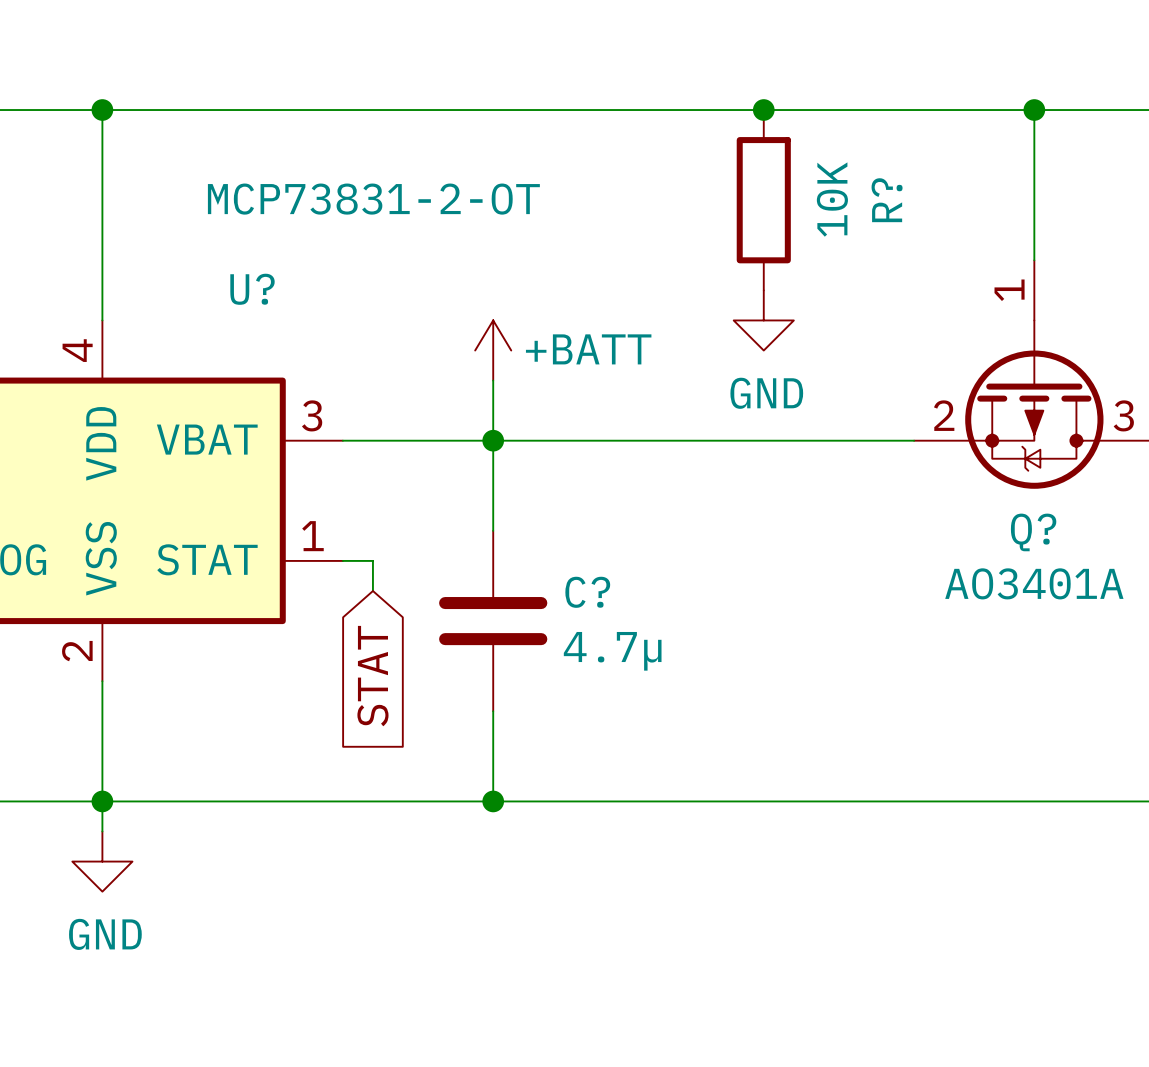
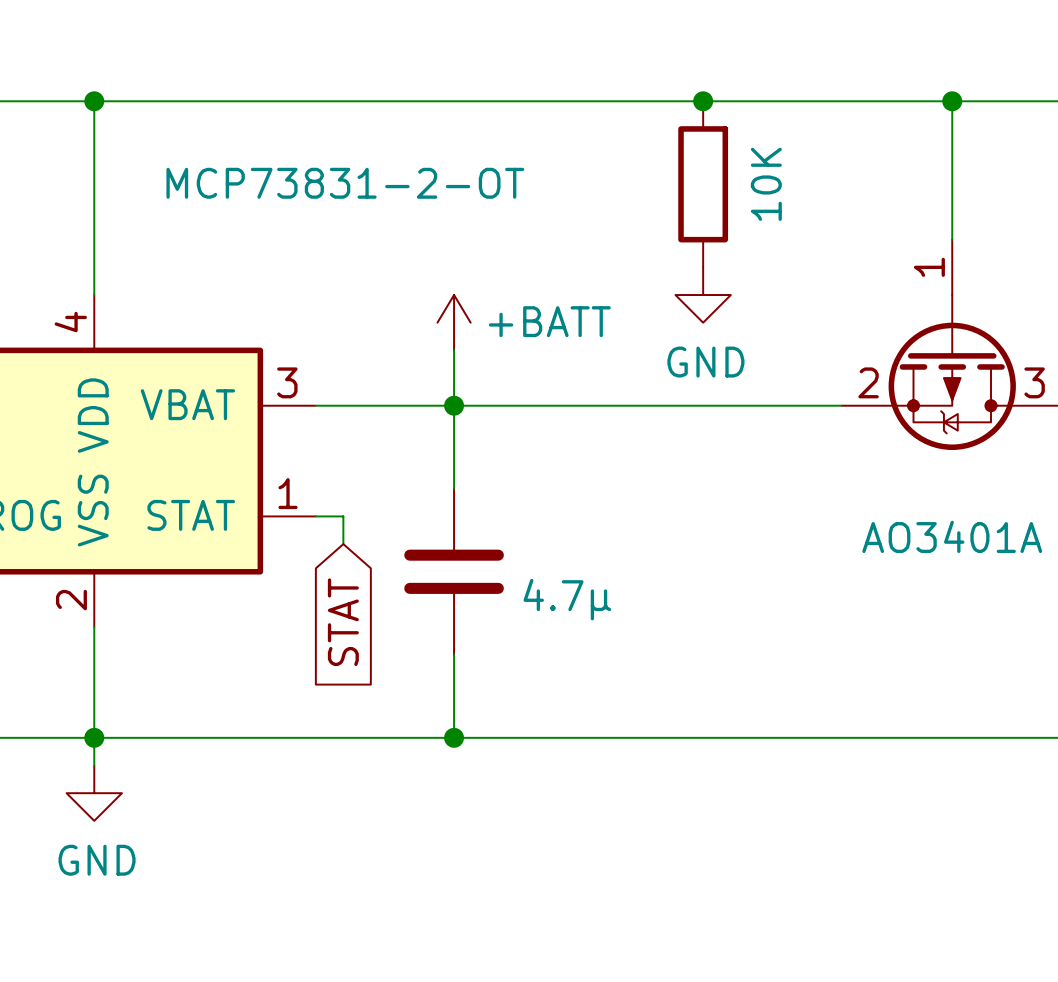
R? name: R? (887, 200) -> none
U? name: U? (252, 289) -> none
Q? name: Q? (1033, 532) -> none
C? name: C? (587, 592) -> none

